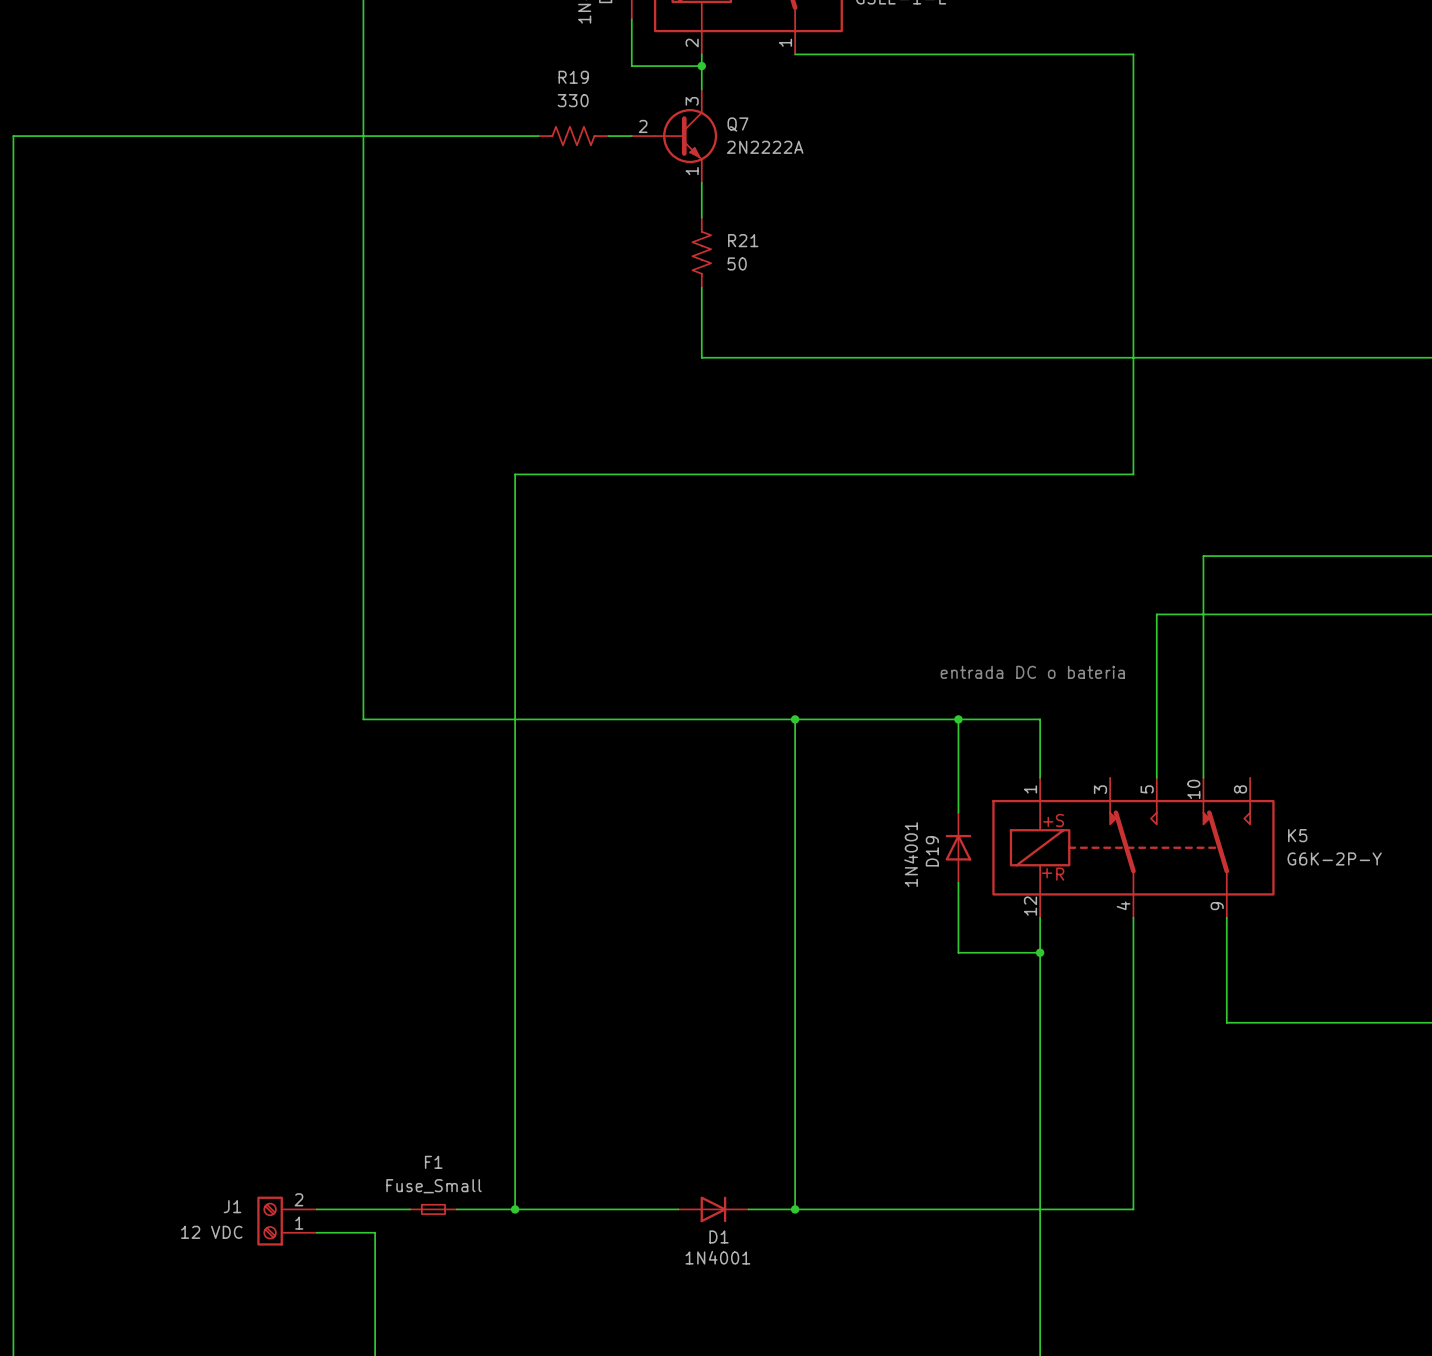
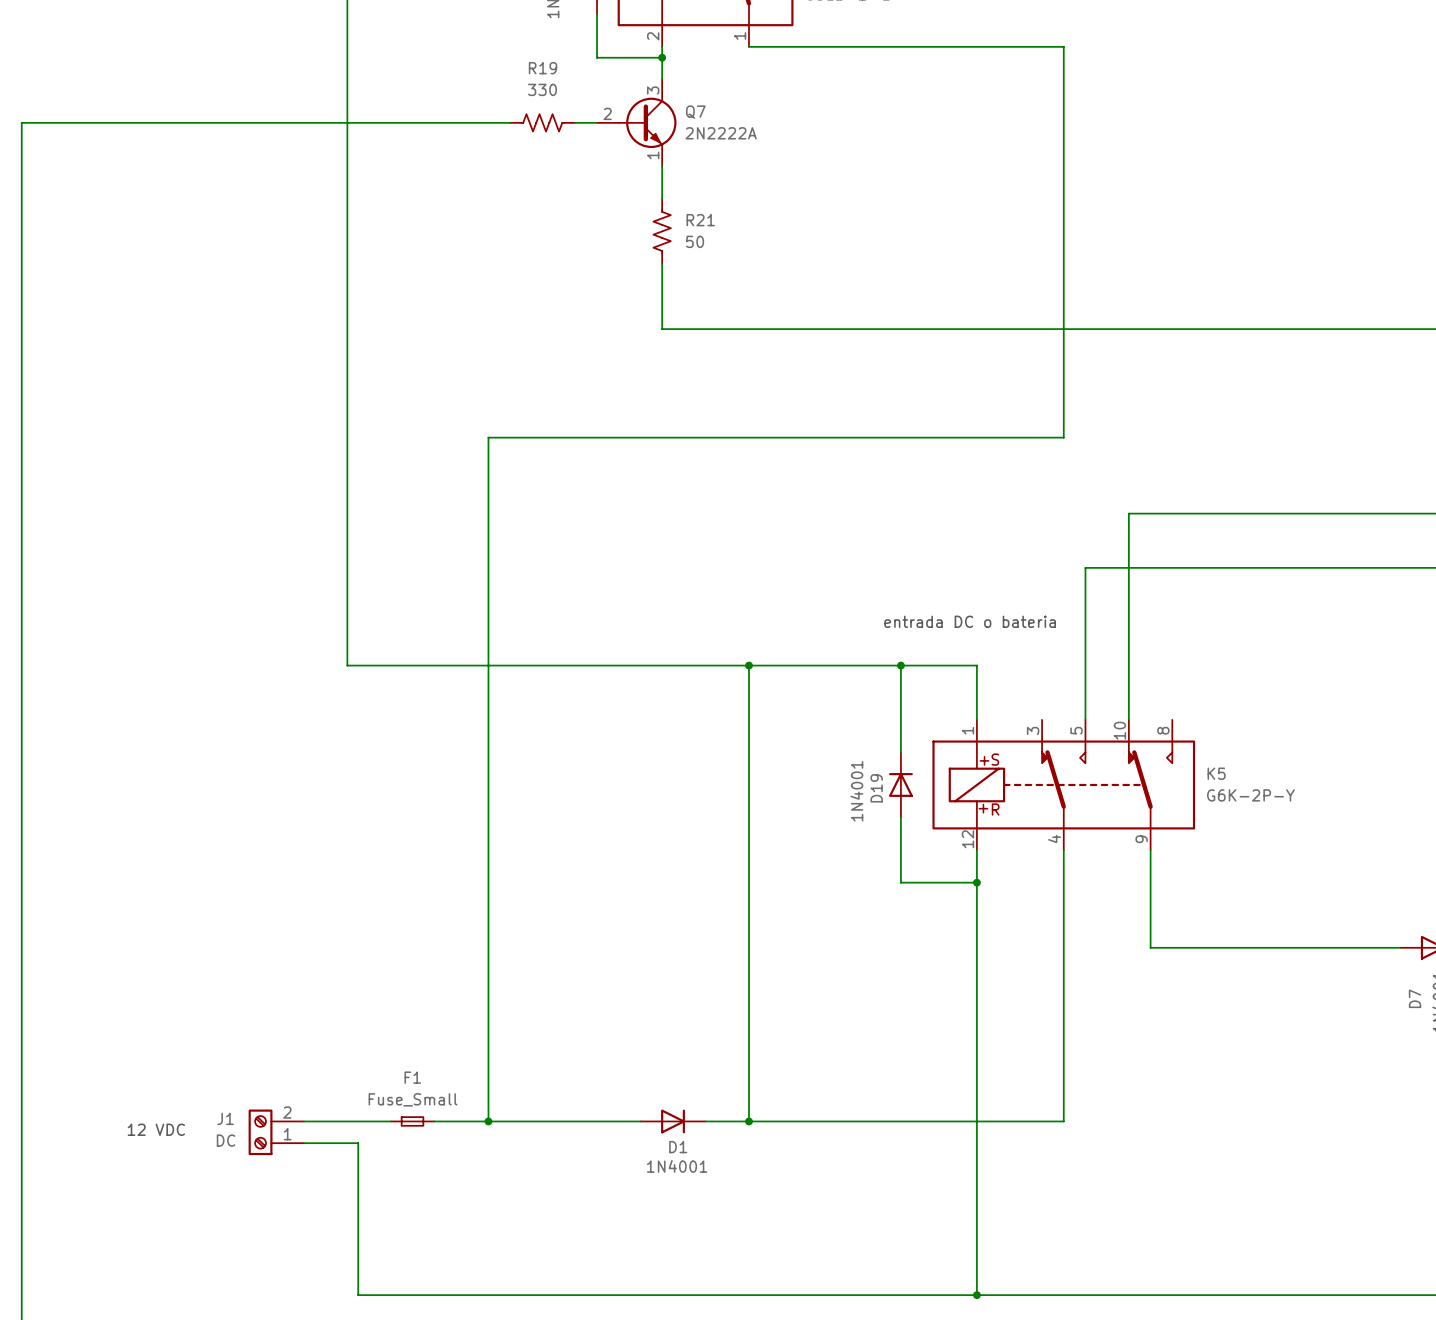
text: none -> 12 VDC (156, 1129)
J1 value: 12 VDC (211, 1232) -> DC (226, 1140)

